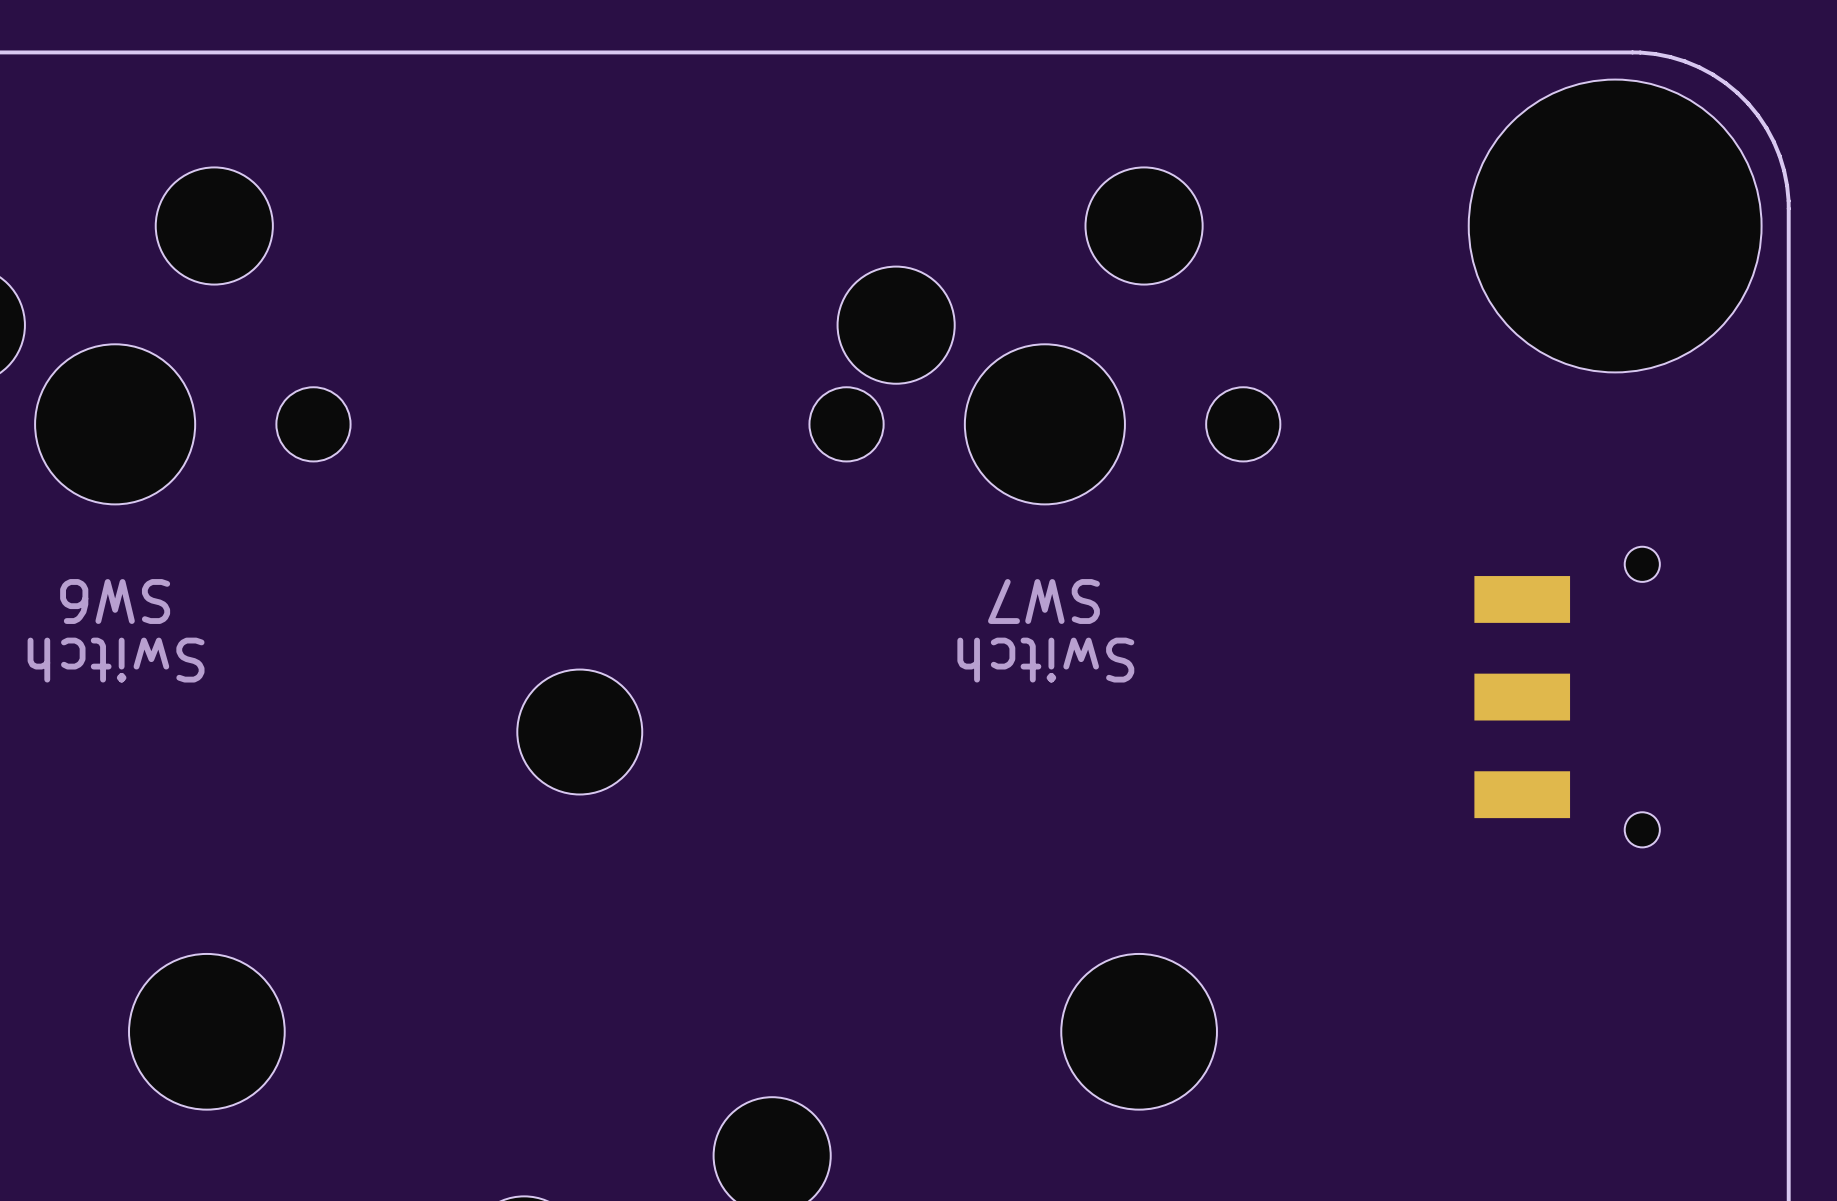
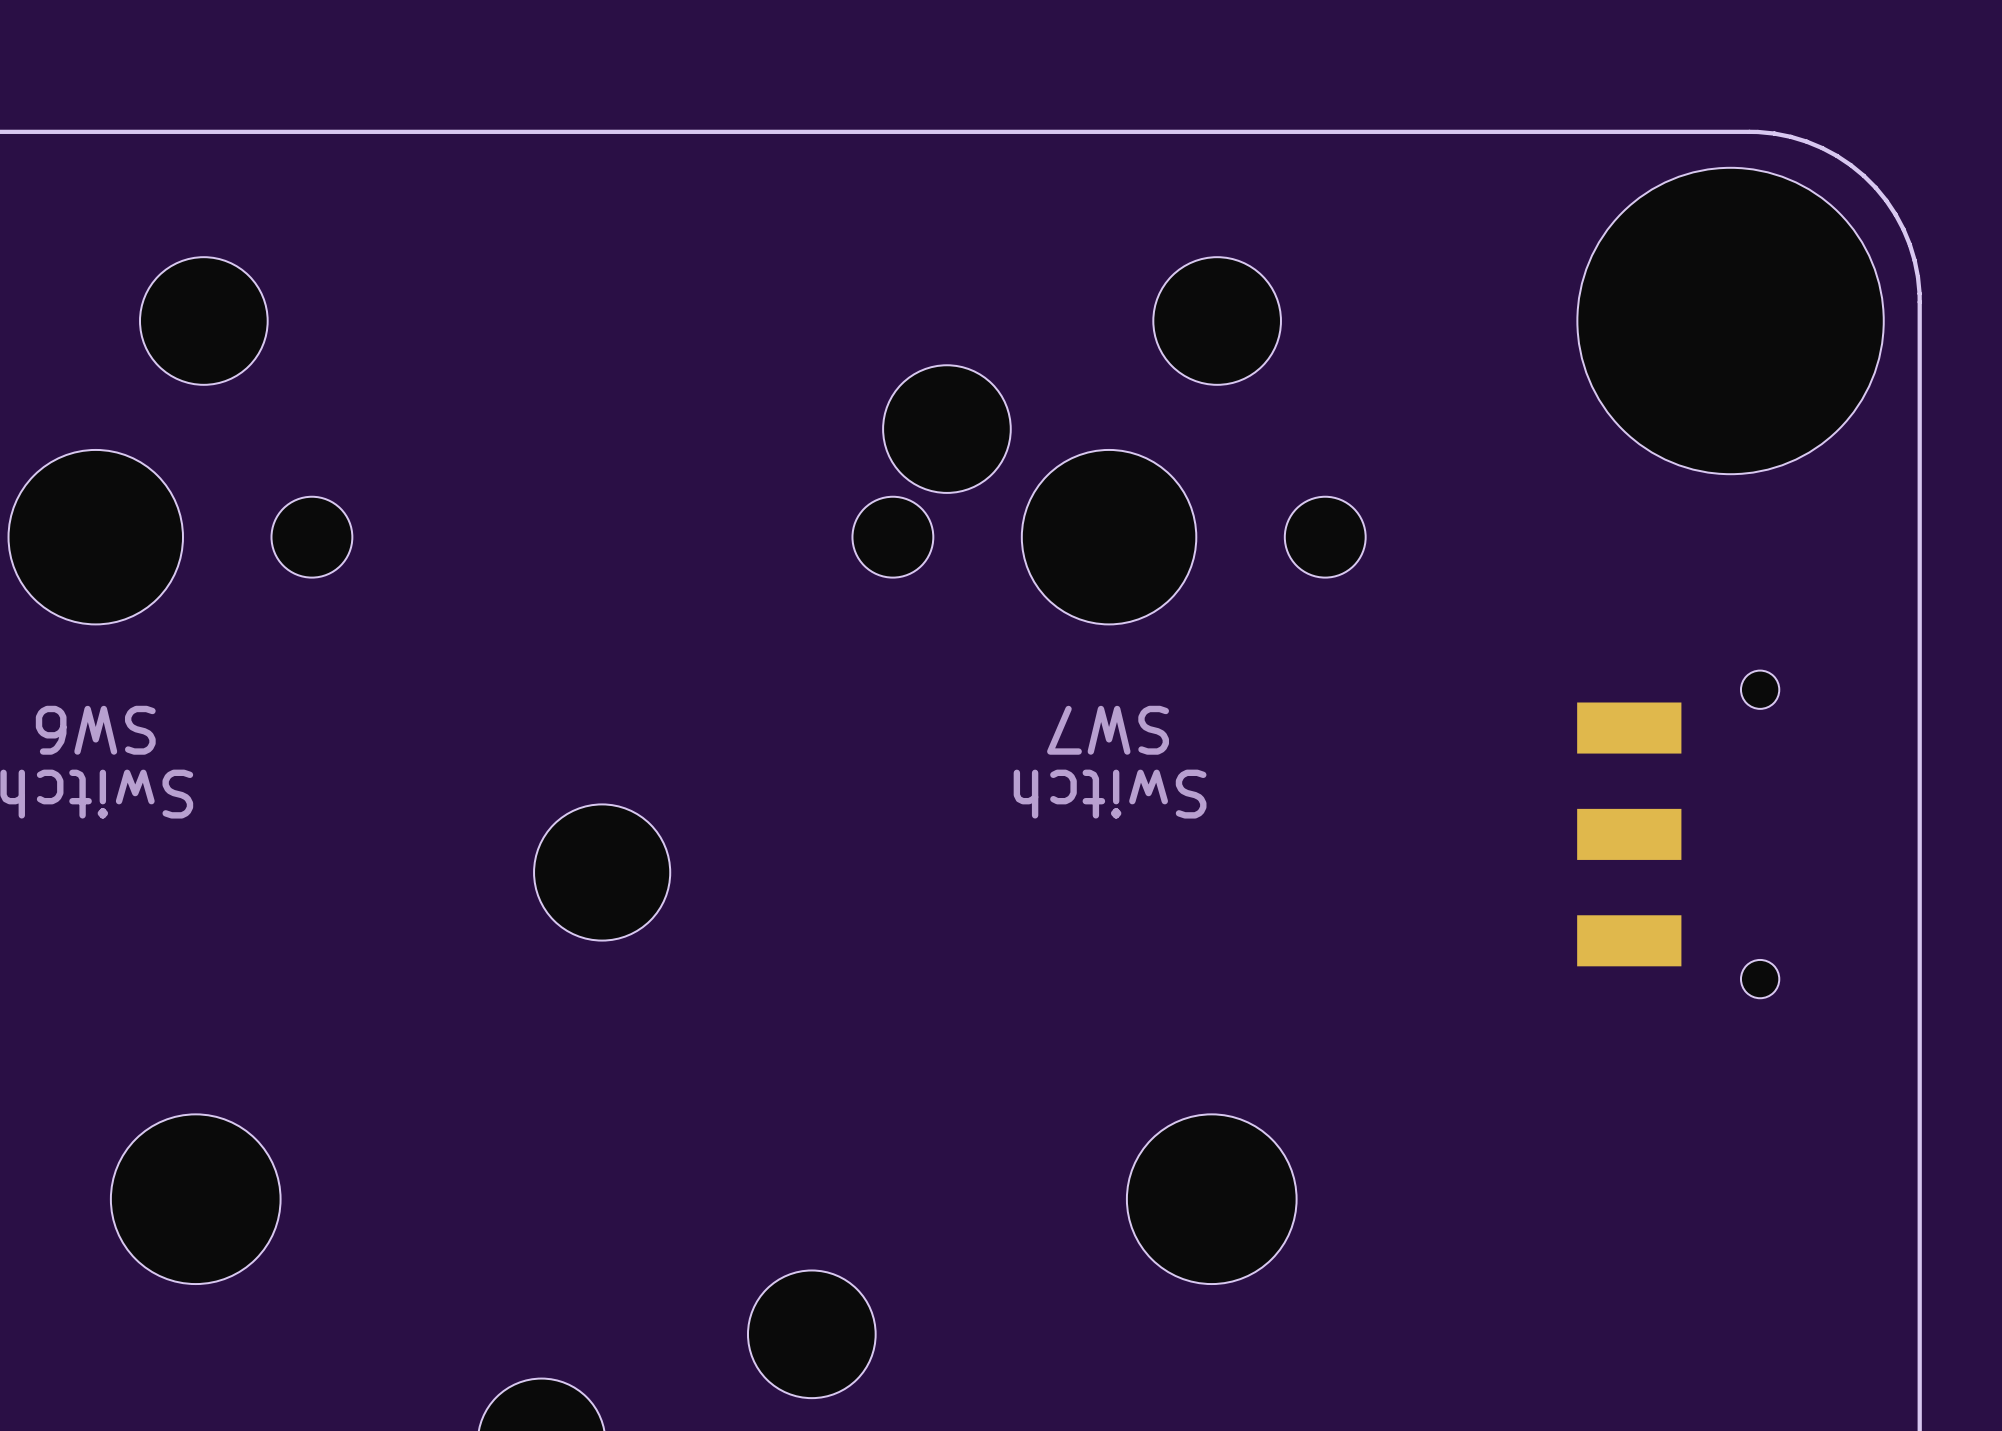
part footprint: [1468, 79, 1762, 373] -> [1577, 167, 1884, 475]

